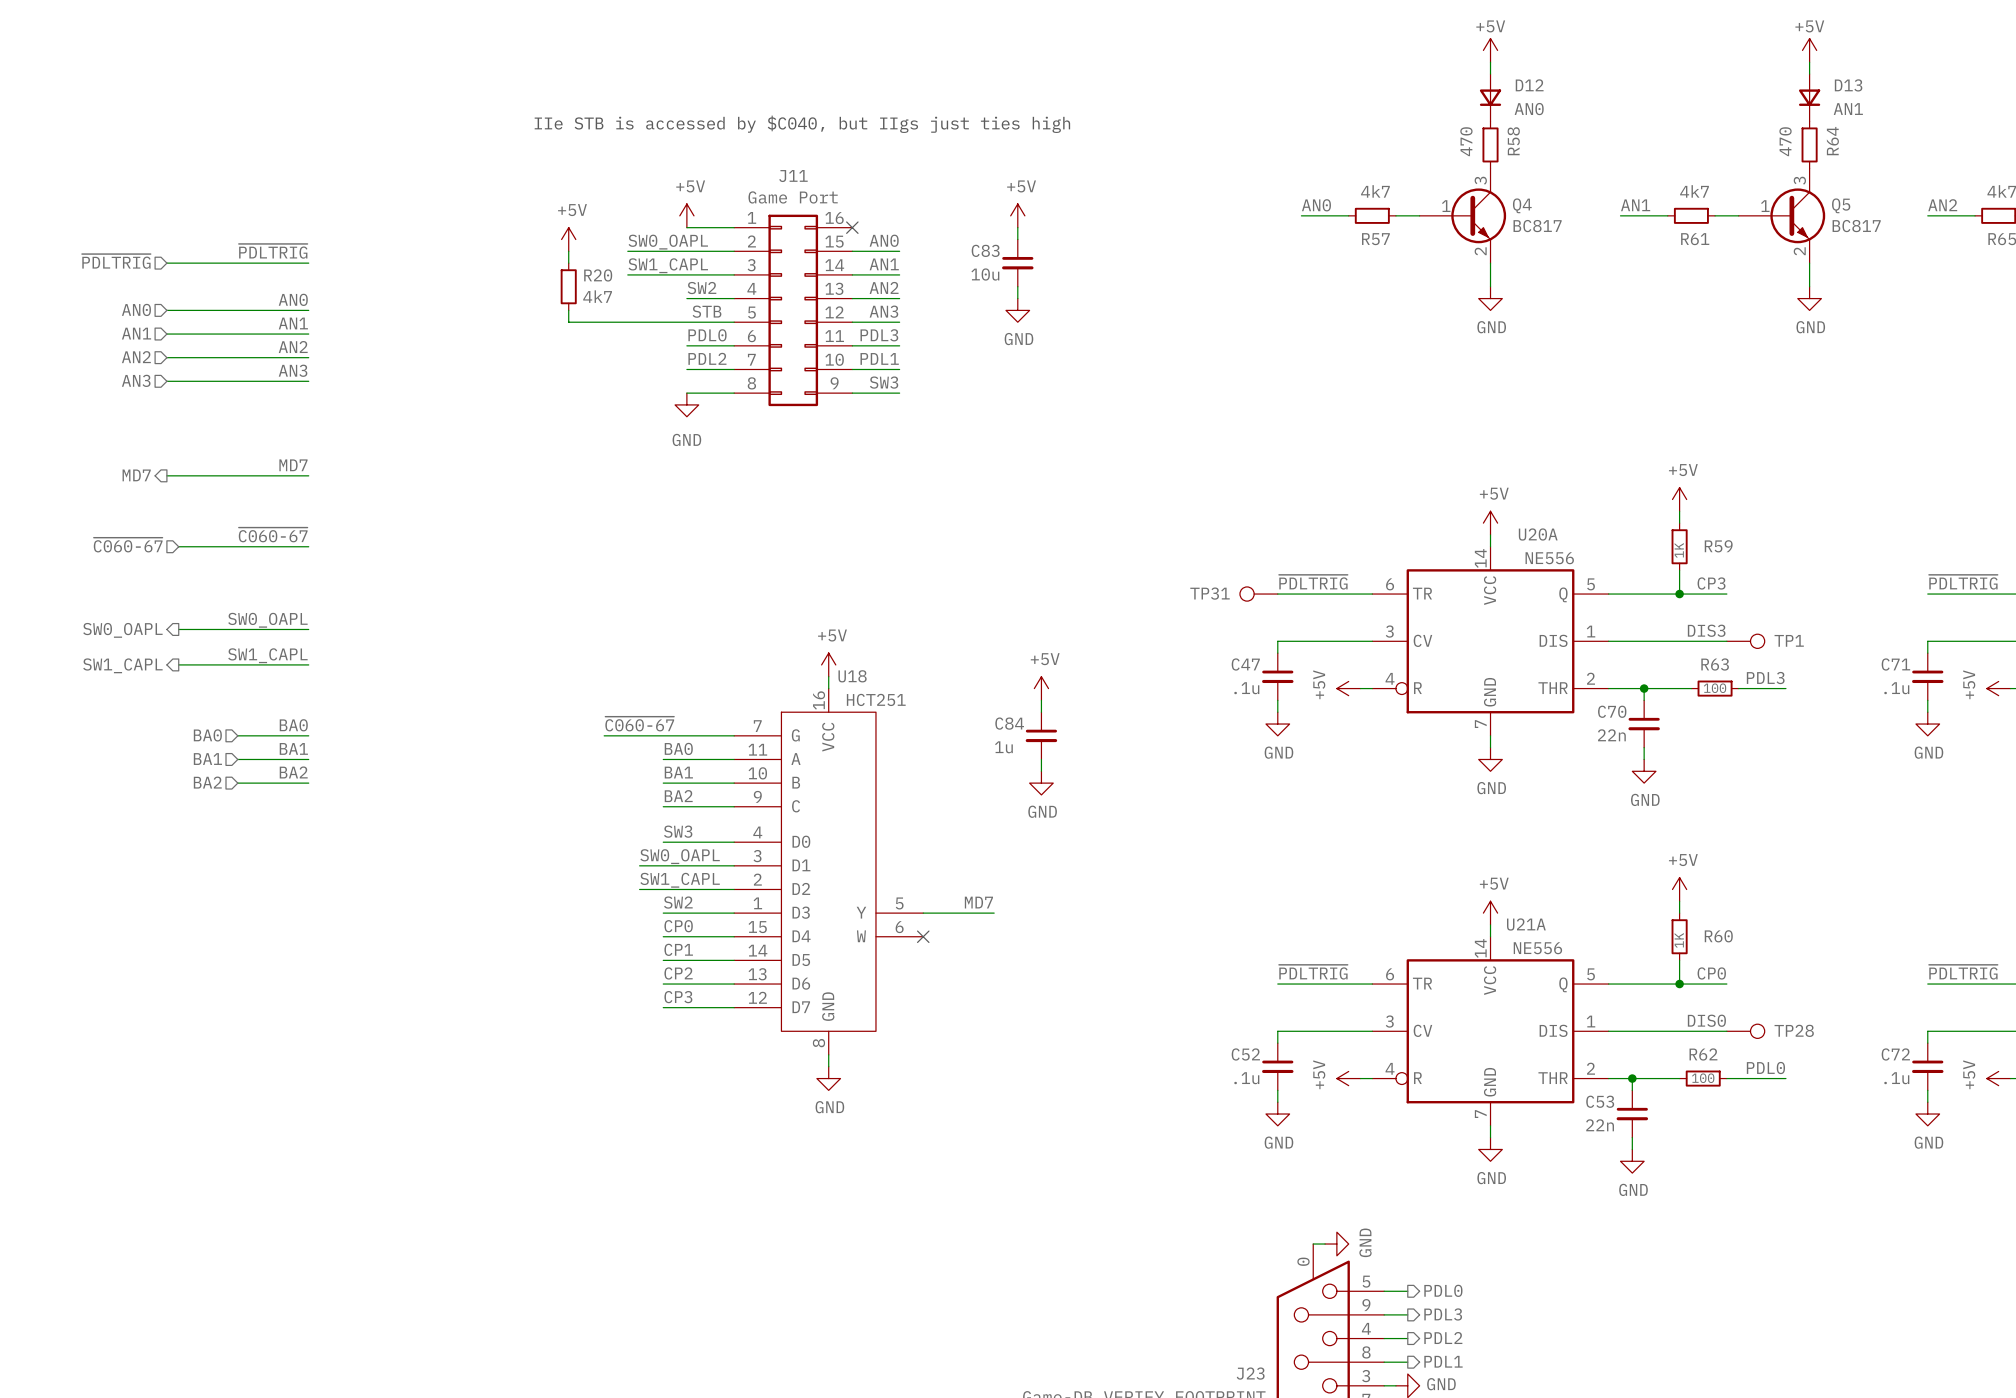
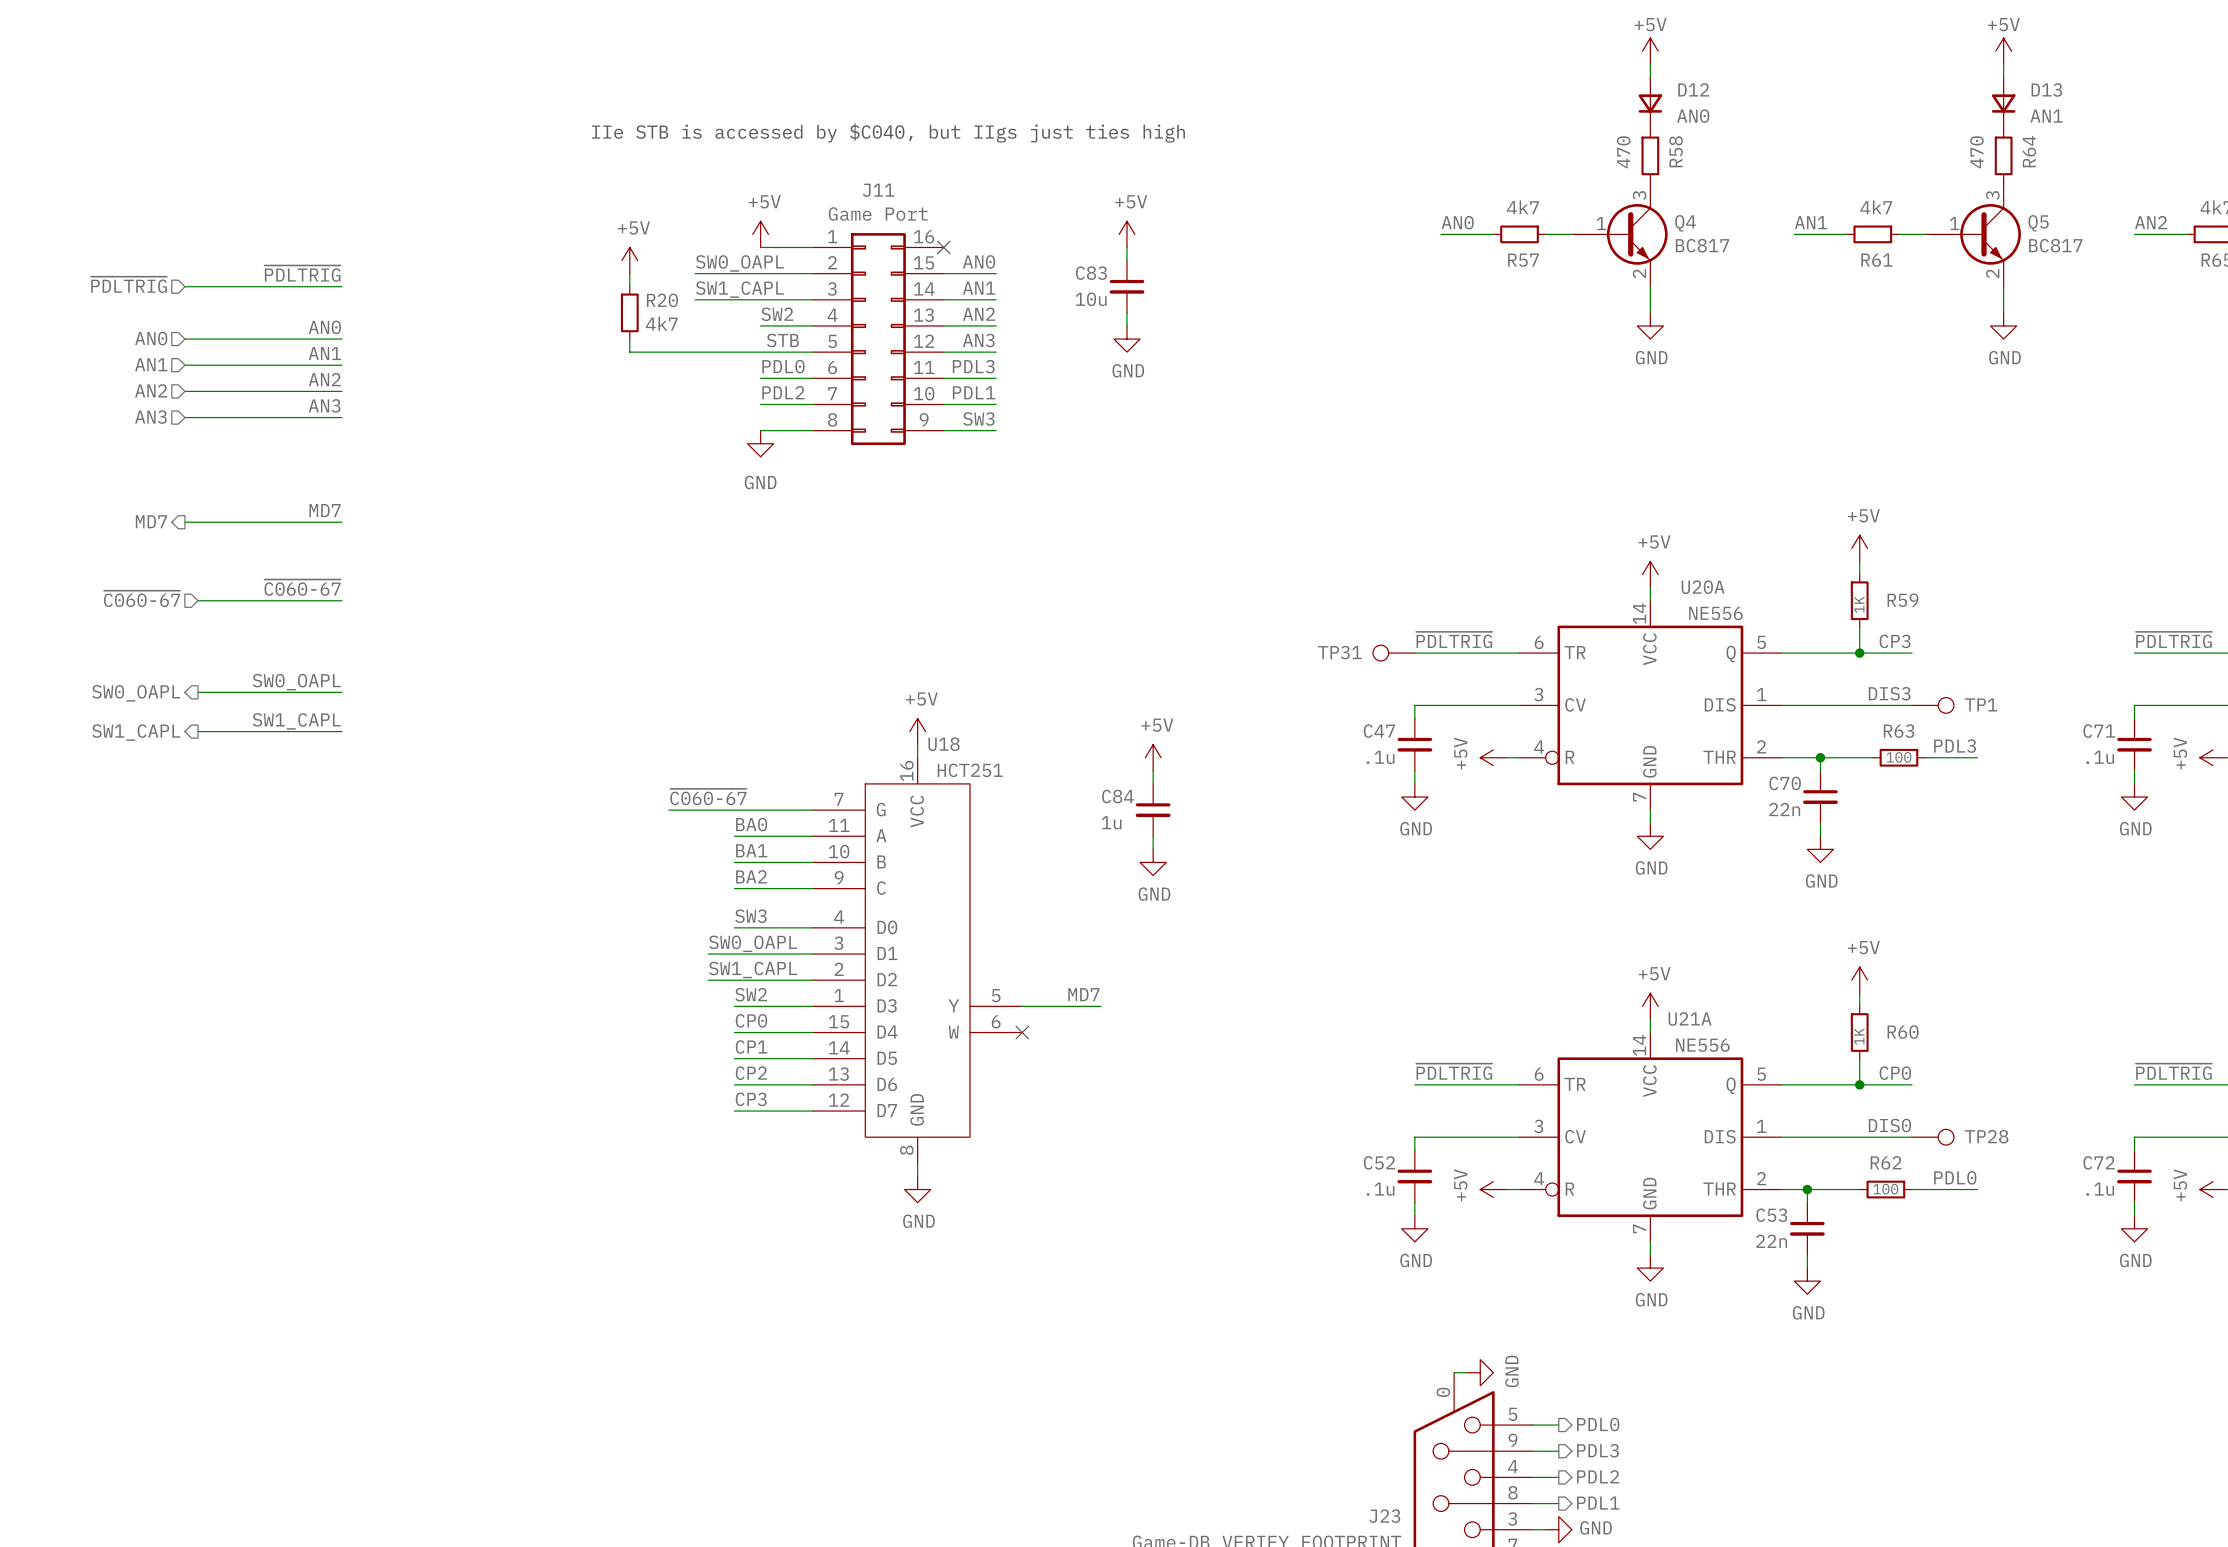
label: BA0 (293, 725) -> none
hierarchical label: BA0 (207, 735) -> none
wire: (237, 735) (308, 735) -> none
label: BA1 (293, 748) -> none
hierarchical label: BA1 (207, 759) -> none
wire: (237, 759) (308, 759) -> none
label: BA2 (293, 772) -> none
hierarchical label: BA2 (207, 782) -> none
wire: (237, 783) (308, 783) -> none

